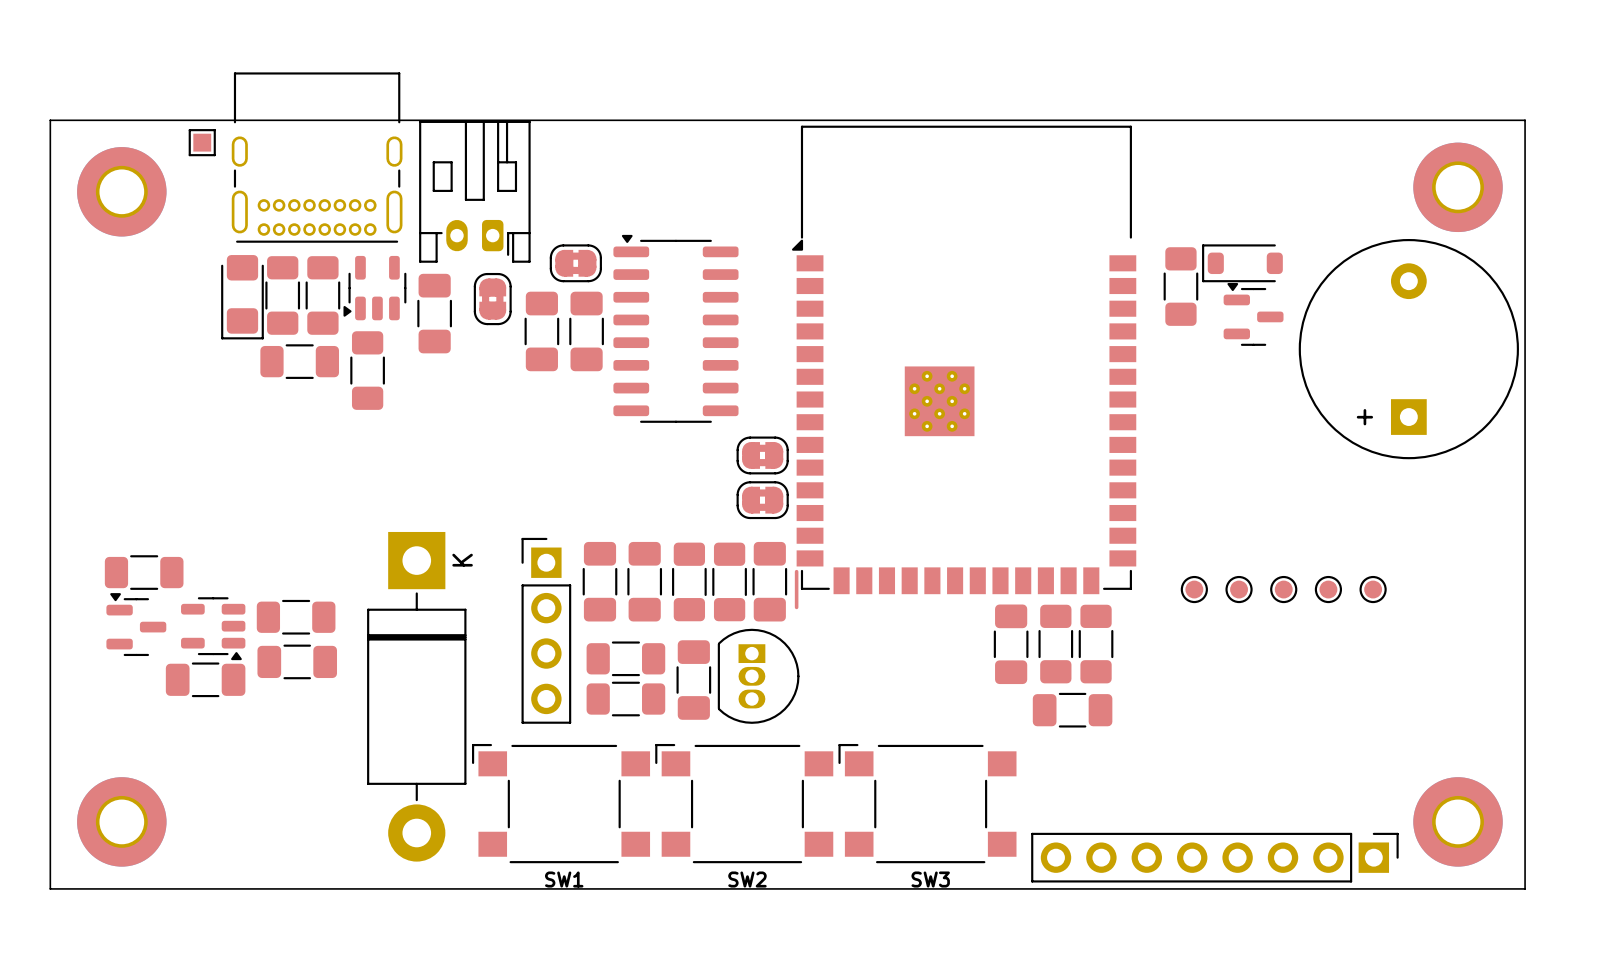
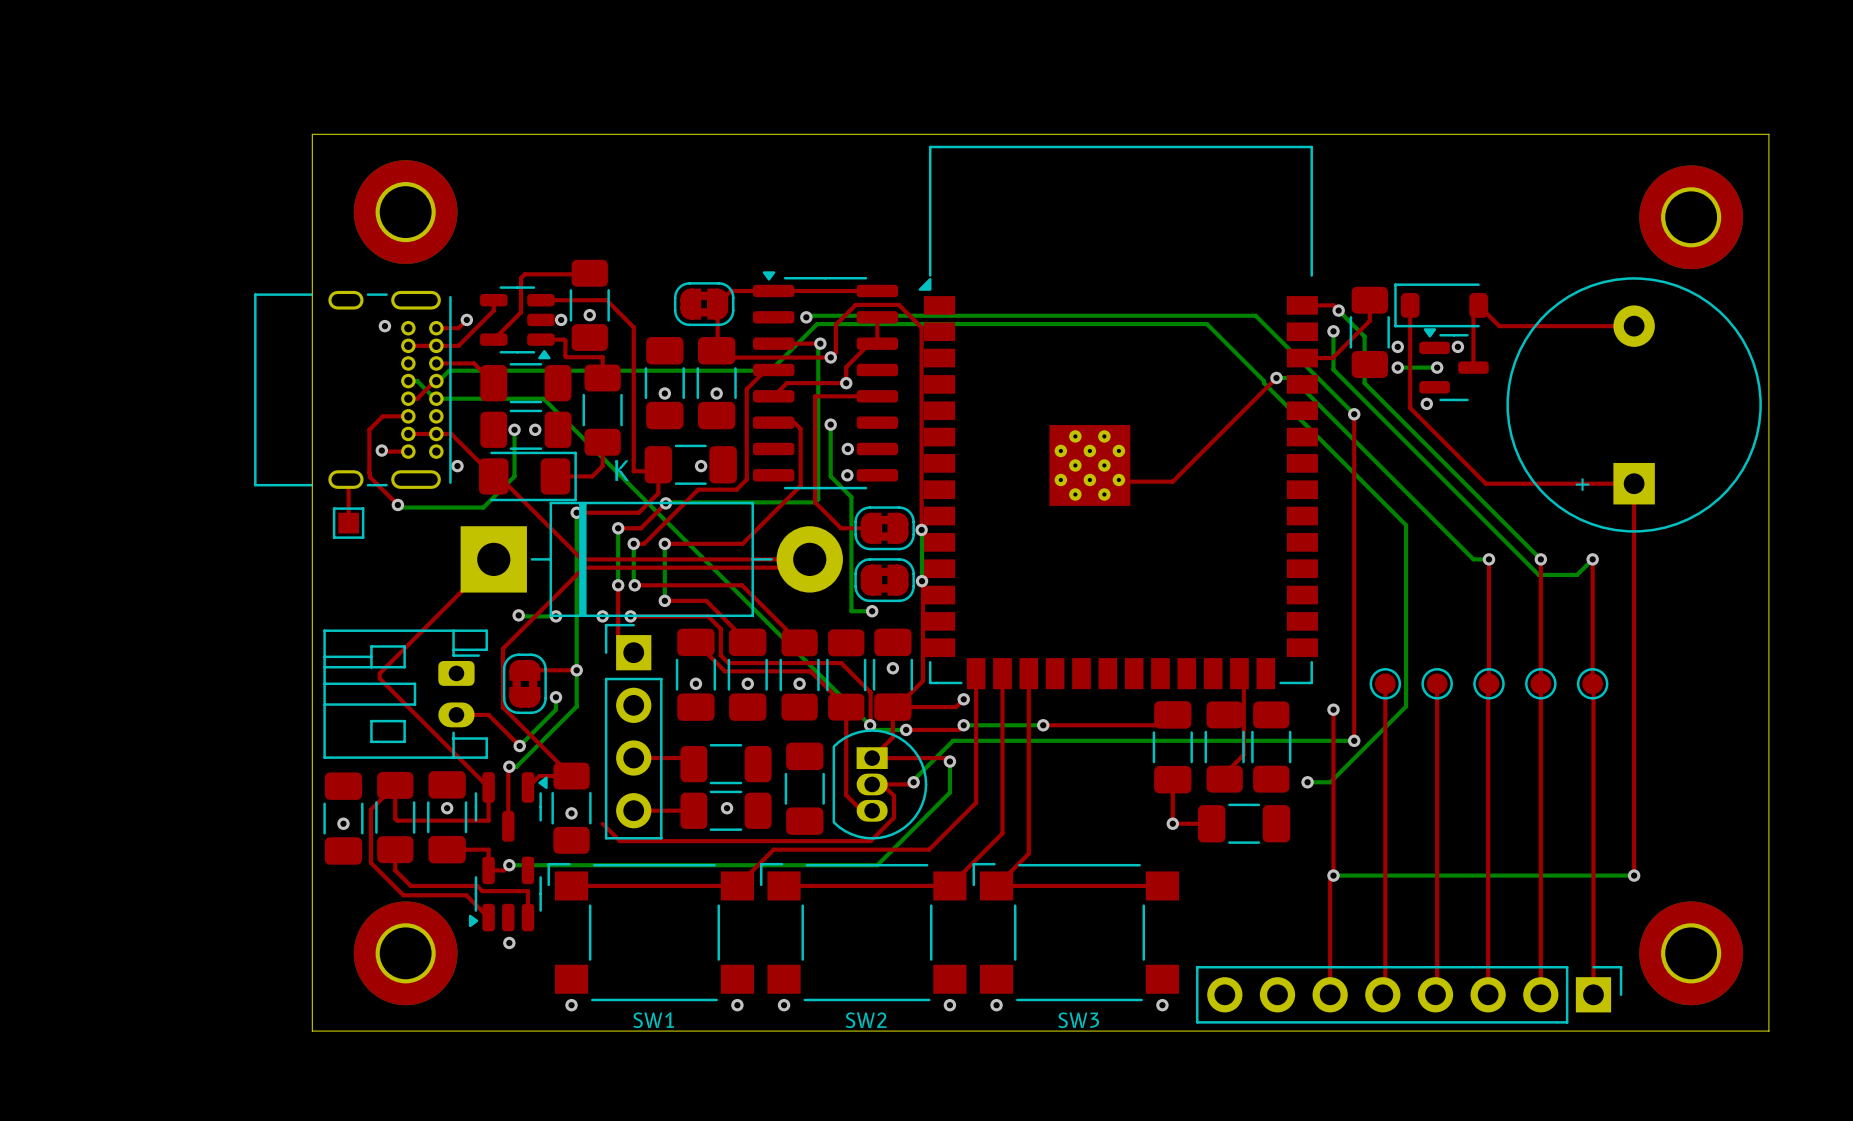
board edge: (1525, 120) (50, 120) (50, 888) (269, 888) -> (1768, 139) (1768, 134) (312, 134) (312, 1031)
part position: (202, 142) -> (348, 523)
part rotation: 0° (317, 157) -> 90° counterclockwise (352, 389)
part position: (317, 157) -> (352, 389)
part position: (121, 191) -> (405, 212)
part rotation: 0° (474, 191) -> 90° counterclockwise (405, 694)
part position: (474, 191) -> (405, 694)
top track: none -> (589, 273) (524, 274) (520, 278) (520, 312) (493, 339)
top track: none -> (877, 290) (730, 290) (717, 304) (716, 350) (723, 357) (830, 357) (835, 352) (835, 324) (855, 304) (898, 304) (921, 327) (921, 529)
top track: none -> (493, 300) (493, 310) (458, 345) (408, 345)
top track: none -> (540, 300) (606, 300) (633, 327) (633, 471) (651, 471) (658, 464) (658, 493) (638, 512) (576, 512)
top track: none -> (1369, 300) (1369, 320) (1332, 358) (1302, 358)
part: none -> (589, 305)
part position: (575, 263) -> (704, 304)
top track: none -> (1302, 305) (1333, 305) (1338, 310)
top track: none -> (1410, 305) (1410, 408) (1485, 483) (1634, 483) (1634, 875)
bottom track: none -> (1338, 310) (1364, 336) (1364, 383) (1540, 559)
via: none -> (1338, 310)
via: none -> (589, 315)
bottom track: none -> (806, 317) (807, 315) (1255, 315) (1354, 414)
via: none -> (806, 317)
top track: none -> (886, 317) (877, 317) (877, 343) (869, 343) (846, 367) (846, 383) (786, 383) (773, 396)
top track: none -> (466, 319) (458, 328) (436, 328)
via: none -> (466, 319)
via: none -> (561, 319)
via: none -> (384, 326)
top track: none -> (1634, 326) (1499, 326) (1478, 305) (1473, 310) (1473, 367)
bottom track: none -> (1333, 331) (1333, 369) (1538, 574) (1577, 574) (1592, 559)
via: none -> (1333, 331)
part rotation: 0° (374, 288) -> 90° counterclockwise (517, 322)
part position: (374, 288) -> (517, 322)
top track: none -> (540, 339) (564, 339) (566, 357) (602, 357) (602, 377)
part: (282, 295) -> none
part: (322, 295) -> none
top track: none -> (773, 343) (820, 343)
bottom track: none -> (820, 343) (818, 345) (818, 499) (815, 502) (665, 503)
via: none -> (820, 343)
part rotation: 0° (242, 297) -> 90° counterclockwise (527, 476)
part position: (242, 297) -> (527, 476)
part: (492, 299) -> none
via: none -> (1397, 346)
via: none -> (1457, 346)
via: none -> (830, 357)
top track: none -> (436, 363) (474, 363) (493, 383)
part: (434, 313) -> none
bottom track: none -> (1397, 367) (1437, 367)
via: none -> (1397, 367)
via: none -> (1437, 367)
top track: none -> (773, 369) (765, 369) (746, 389) (746, 479) (736, 489) (698, 489) (644, 543) (633, 543)
top track: none -> (1276, 377) (1172, 481) (1120, 481) (1118, 479)
bottom track: none -> (1276, 377) (1292, 377) (1473, 559) (1488, 559)
via: none -> (1276, 377)
bottom track: none -> (408, 381) (417, 381) (434, 398) (543, 398) (874, 729) (906, 729)
top track: none -> (436, 381) (417, 398) (408, 398)
bottom track: none -> (436, 381) (438, 381) (449, 370) (770, 370) (817, 324) (1207, 324) (1406, 525) (1406, 706) (1330, 782) (1307, 782)
part position: (675, 328) -> (825, 380)
part: none -> (525, 383)
part: none -> (716, 383)
via: none -> (846, 383)
part: (541, 331) -> none
part position: (586, 331) -> (664, 383)
via: none -> (664, 393)
via: none -> (716, 393)
top track: none -> (877, 396) (815, 396) (815, 502) (841, 528) (871, 528)
via: none -> (1426, 403)
part: none -> (602, 410)
top track: none -> (1354, 414) (1354, 740)
via: none -> (1354, 414)
top track: none -> (408, 416) (382, 416) (369, 429) (369, 476) (397, 504)
part: (299, 361) -> none
top track: none -> (773, 422) (794, 422) (800, 428) (800, 485) (742, 543) (664, 543)
bottom track: none -> (830, 424) (830, 476) (851, 497) (851, 611) (872, 611)
via: none -> (830, 424)
part: (367, 370) -> none
bottom track: none -> (514, 429) (514, 476) (483, 507) (400, 507) (397, 504)
via: none -> (514, 429)
part: none -> (525, 429)
via: none -> (535, 429)
top track: none -> (408, 433) (451, 433) (493, 476) (498, 476) (581, 559) (809, 559) (809, 575) (817, 567) (583, 567) (503, 648) (503, 707) (571, 776) (539, 776) (527, 787)
top track: none -> (602, 442) (602, 466) (592, 476) (555, 476)
via: none -> (847, 448)
top track: none -> (381, 450) (408, 451)
via: none -> (381, 450)
part: none -> (690, 464)
via: none -> (457, 466)
via: none -> (701, 466)
via: none -> (847, 475)
top track: none -> (345, 479) (348, 482) (348, 523)
top track: none -> (665, 503) (640, 528) (618, 528)
via: none -> (665, 503)
via: none -> (397, 504)
bottom track: none -> (576, 512) (576, 706) (516, 766) (509, 766)
via: none -> (576, 512)
bottom track: none -> (618, 528) (618, 585)
via: none -> (618, 528)
bottom track: none -> (921, 529) (922, 581)
via: none -> (921, 529)
bottom track: none -> (633, 543) (634, 585)
via: none -> (633, 543)
bottom track: none -> (664, 543) (664, 600)
via: none -> (664, 543)
top track: none -> (493, 559) (379, 673) (379, 678) (488, 787) (488, 820) (397, 820) (395, 818) (395, 785) (370, 809) (370, 862) (403, 895) (466, 895) (488, 917)
part: none -> (651, 559)
top track: none -> (1488, 559) (1488, 994)
via: none -> (1488, 559)
top track: none -> (1540, 559) (1540, 994)
via: none -> (1540, 559)
top track: none -> (1592, 559) (1593, 994)
via: none -> (1592, 559)
top track: none -> (922, 581) (922, 680) (898, 705)
via: none -> (922, 581)
top track: none -> (618, 585) (618, 637) (623, 642)
via: none -> (618, 585)
top track: none -> (634, 585) (742, 585) (799, 642)
via: none -> (634, 585)
top track: none -> (664, 600) (706, 600) (747, 642)
via: none -> (664, 600)
via: none -> (872, 611)
bottom track: none -> (518, 615) (555, 616)
via: none -> (518, 615)
via: none -> (555, 616)
via: none -> (602, 616)
top track: none -> (630, 616) (708, 616) (720, 628) (720, 655) (728, 663) (841, 663) (870, 692) (870, 725)
via: none -> (630, 616)
top track: none -> (685, 652) (695, 642) (724, 671) (810, 671) (846, 707) (846, 795) (861, 810) (872, 810)
top track: (796, 571) (796, 607) -> none
part: (144, 572) -> none
via: none -> (892, 668)
top track: none -> (524, 670) (576, 670)
via: none -> (576, 670)
top track: none -> (976, 673) (976, 802) (929, 849) (773, 849) (737, 885) (571, 885)
top track: none -> (1002, 673) (1002, 833) (949, 885) (784, 885)
top track: none -> (1028, 673) (1028, 853) (996, 885) (1162, 885)
top track: none -> (1239, 673) (1243, 677) (1243, 754) (1219, 779)
part: none -> (524, 683)
via: none -> (695, 683)
via: none -> (747, 683)
via: none -> (799, 683)
top track: none -> (1385, 683) (1385, 992) (1382, 994)
top track: none -> (1437, 683) (1437, 993) (1435, 994)
bottom track: none -> (555, 697) (555, 709) (519, 745)
via: none -> (555, 697)
top track: none -> (963, 699) (955, 707) (892, 707) (892, 737) (872, 758) (946, 758) (949, 761)
via: none -> (963, 699)
top track: none -> (1333, 709) (1333, 875) (1330, 878) (1330, 994)
via: none -> (1333, 709)
top track: none -> (456, 714) (488, 714) (519, 745)
top track: none -> (1167, 714) (1157, 725) (1043, 725)
part rotation: 0° (296, 617) -> 90° clockwise (395, 817)
part position: (296, 617) -> (395, 817)
part rotation: 0° (136, 624) -> 90° clockwise (511, 806)
part position: (136, 624) -> (511, 806)
via: none -> (870, 725)
top track: none -> (963, 725) (959, 729) (906, 729)
bottom track: none -> (963, 725) (1043, 725)
via: none -> (963, 725)
via: none -> (1043, 725)
part: (213, 628) -> none
via: none -> (906, 729)
bottom track: none -> (1354, 740) (953, 740) (913, 782)
via: none -> (1354, 740)
via: none -> (519, 745)
top track: none -> (633, 758) (687, 758) (693, 764)
bottom track: none -> (949, 761) (949, 792) (877, 865) (509, 865)
via: none -> (949, 761)
part rotation: 0° (297, 661) -> 90° clockwise (343, 818)
top track: none -> (509, 766) (508, 826)
via: none -> (509, 766)
top track: none -> (1172, 779) (1172, 823) (1211, 823)
top track: none -> (913, 782) (911, 784) (872, 784)
via: none -> (913, 782)
via: none -> (1307, 782)
top track: none -> (882, 784) (893, 795) (893, 817) (870, 841) (619, 841) (602, 823)
part: (205, 679) -> none
via: none -> (447, 808)
part: (416, 696) -> none
part: none -> (571, 808)
via: none -> (727, 808)
top track: none -> (633, 810) (693, 810)
via: none -> (571, 813)
part: none -> (447, 817)
via: none -> (343, 823)
via: none -> (1172, 823)
top track: none -> (395, 849) (395, 870) (410, 885) (477, 885) (482, 891) (527, 891) (527, 917)
top track: none -> (447, 849) (488, 849) (488, 870) (504, 870) (509, 865)
via: none -> (509, 865)
bottom track: none -> (1333, 875) (1634, 875)
via: none -> (1333, 875)
via: none -> (1634, 875)
part: none -> (505, 893)
via: none -> (509, 942)
part position: (121, 821) -> (405, 953)
via: none -> (571, 1005)
via: none -> (737, 1005)
via: none -> (784, 1005)
via: none -> (949, 1005)
via: none -> (996, 1005)
via: none -> (1162, 1005)

